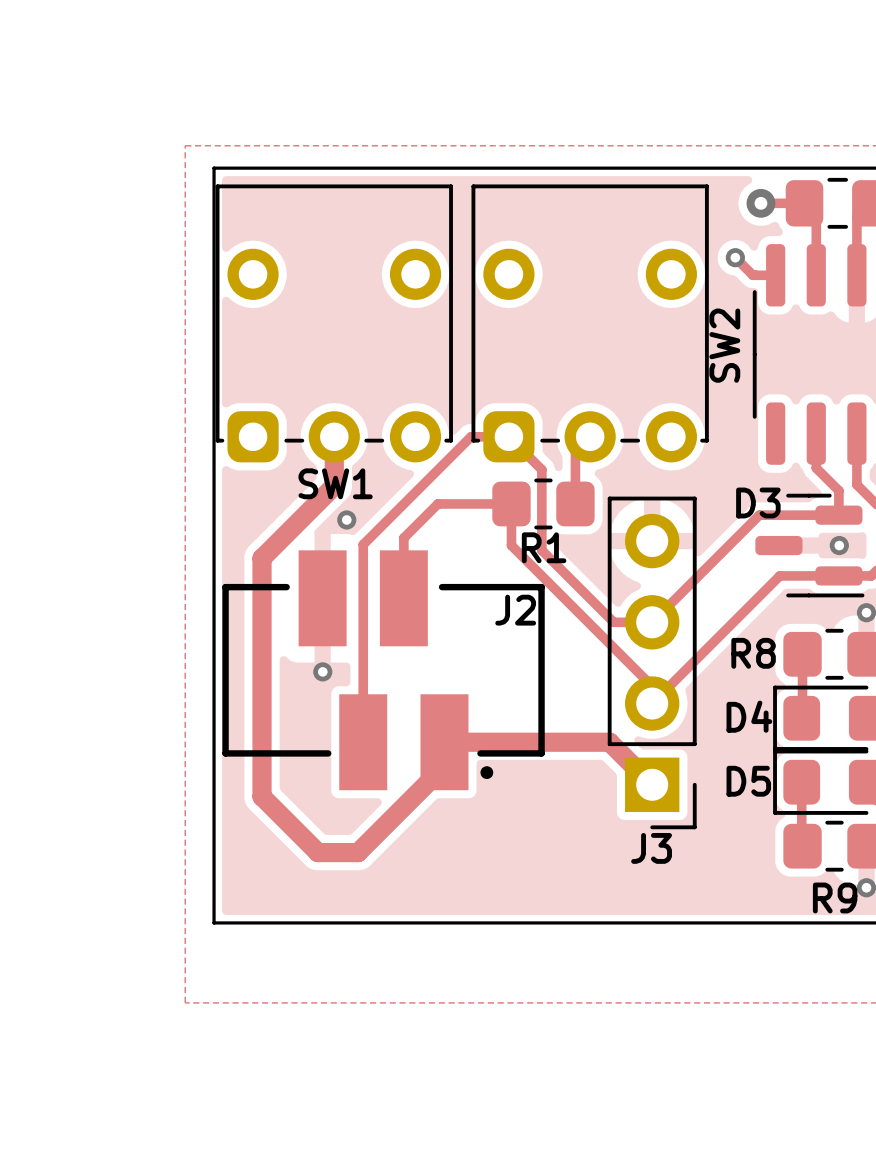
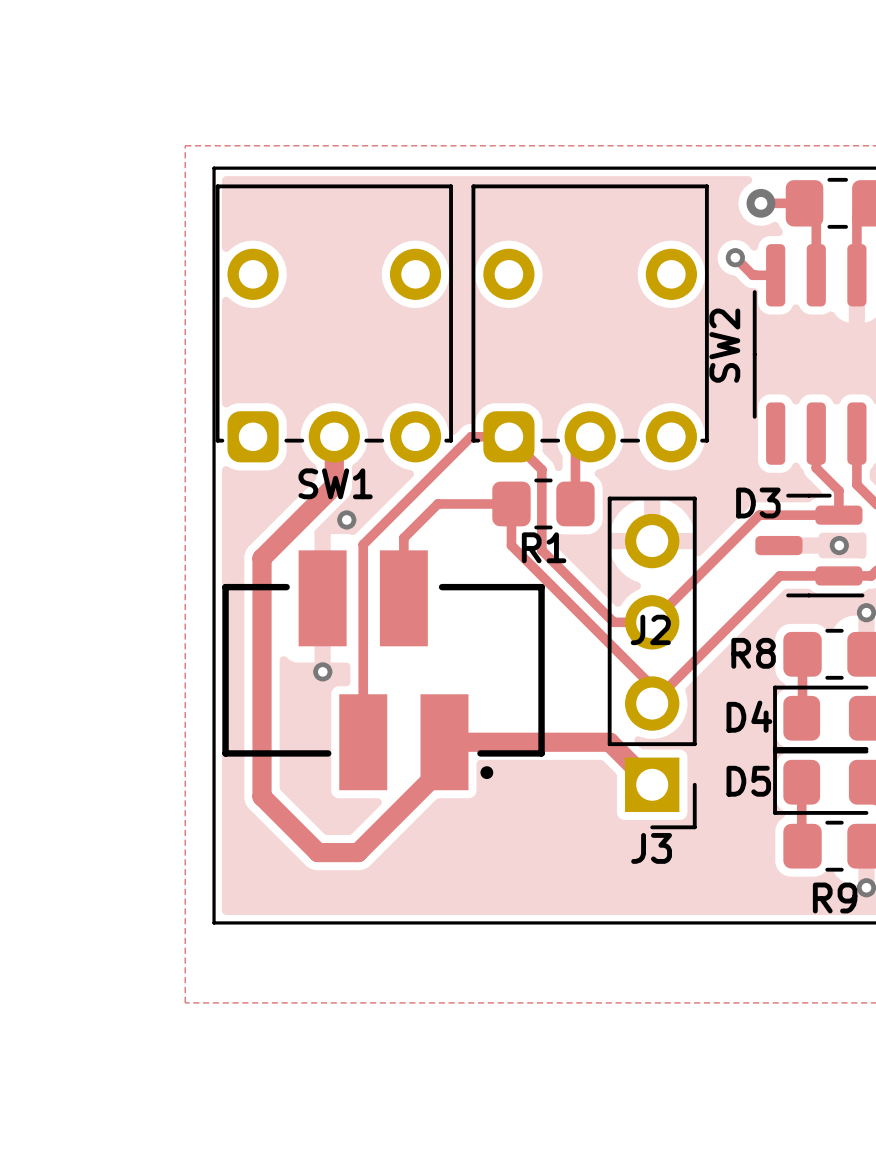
J2 name position: J2 (515, 610) -> J2 (650, 629)

